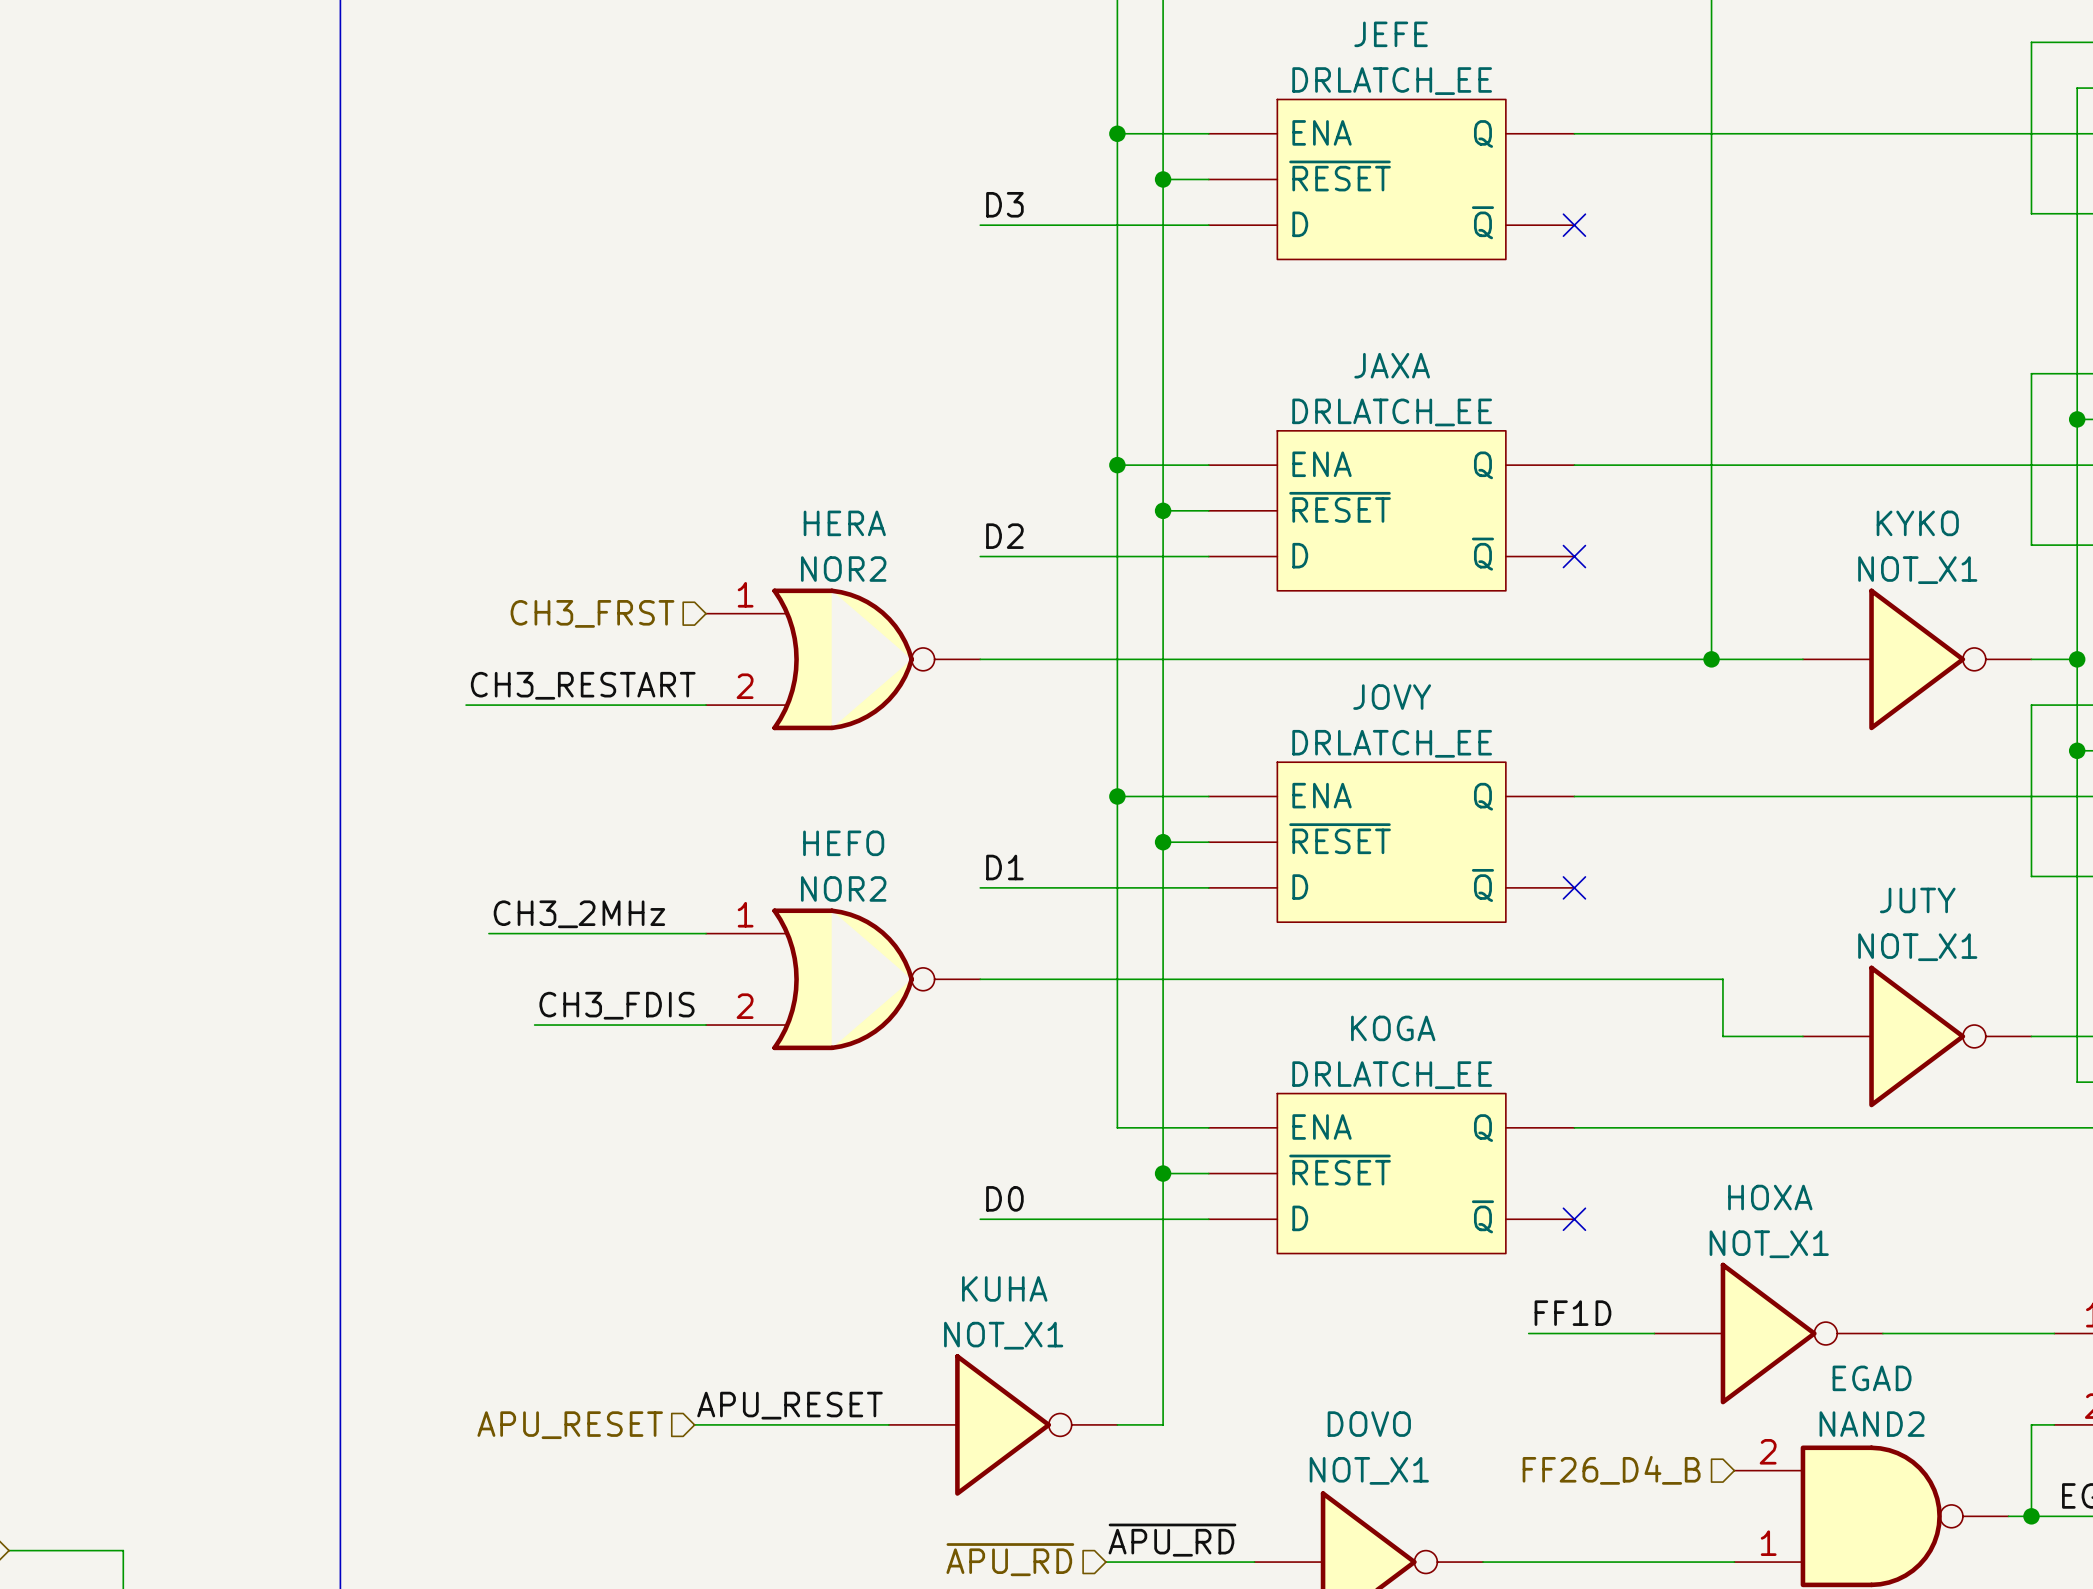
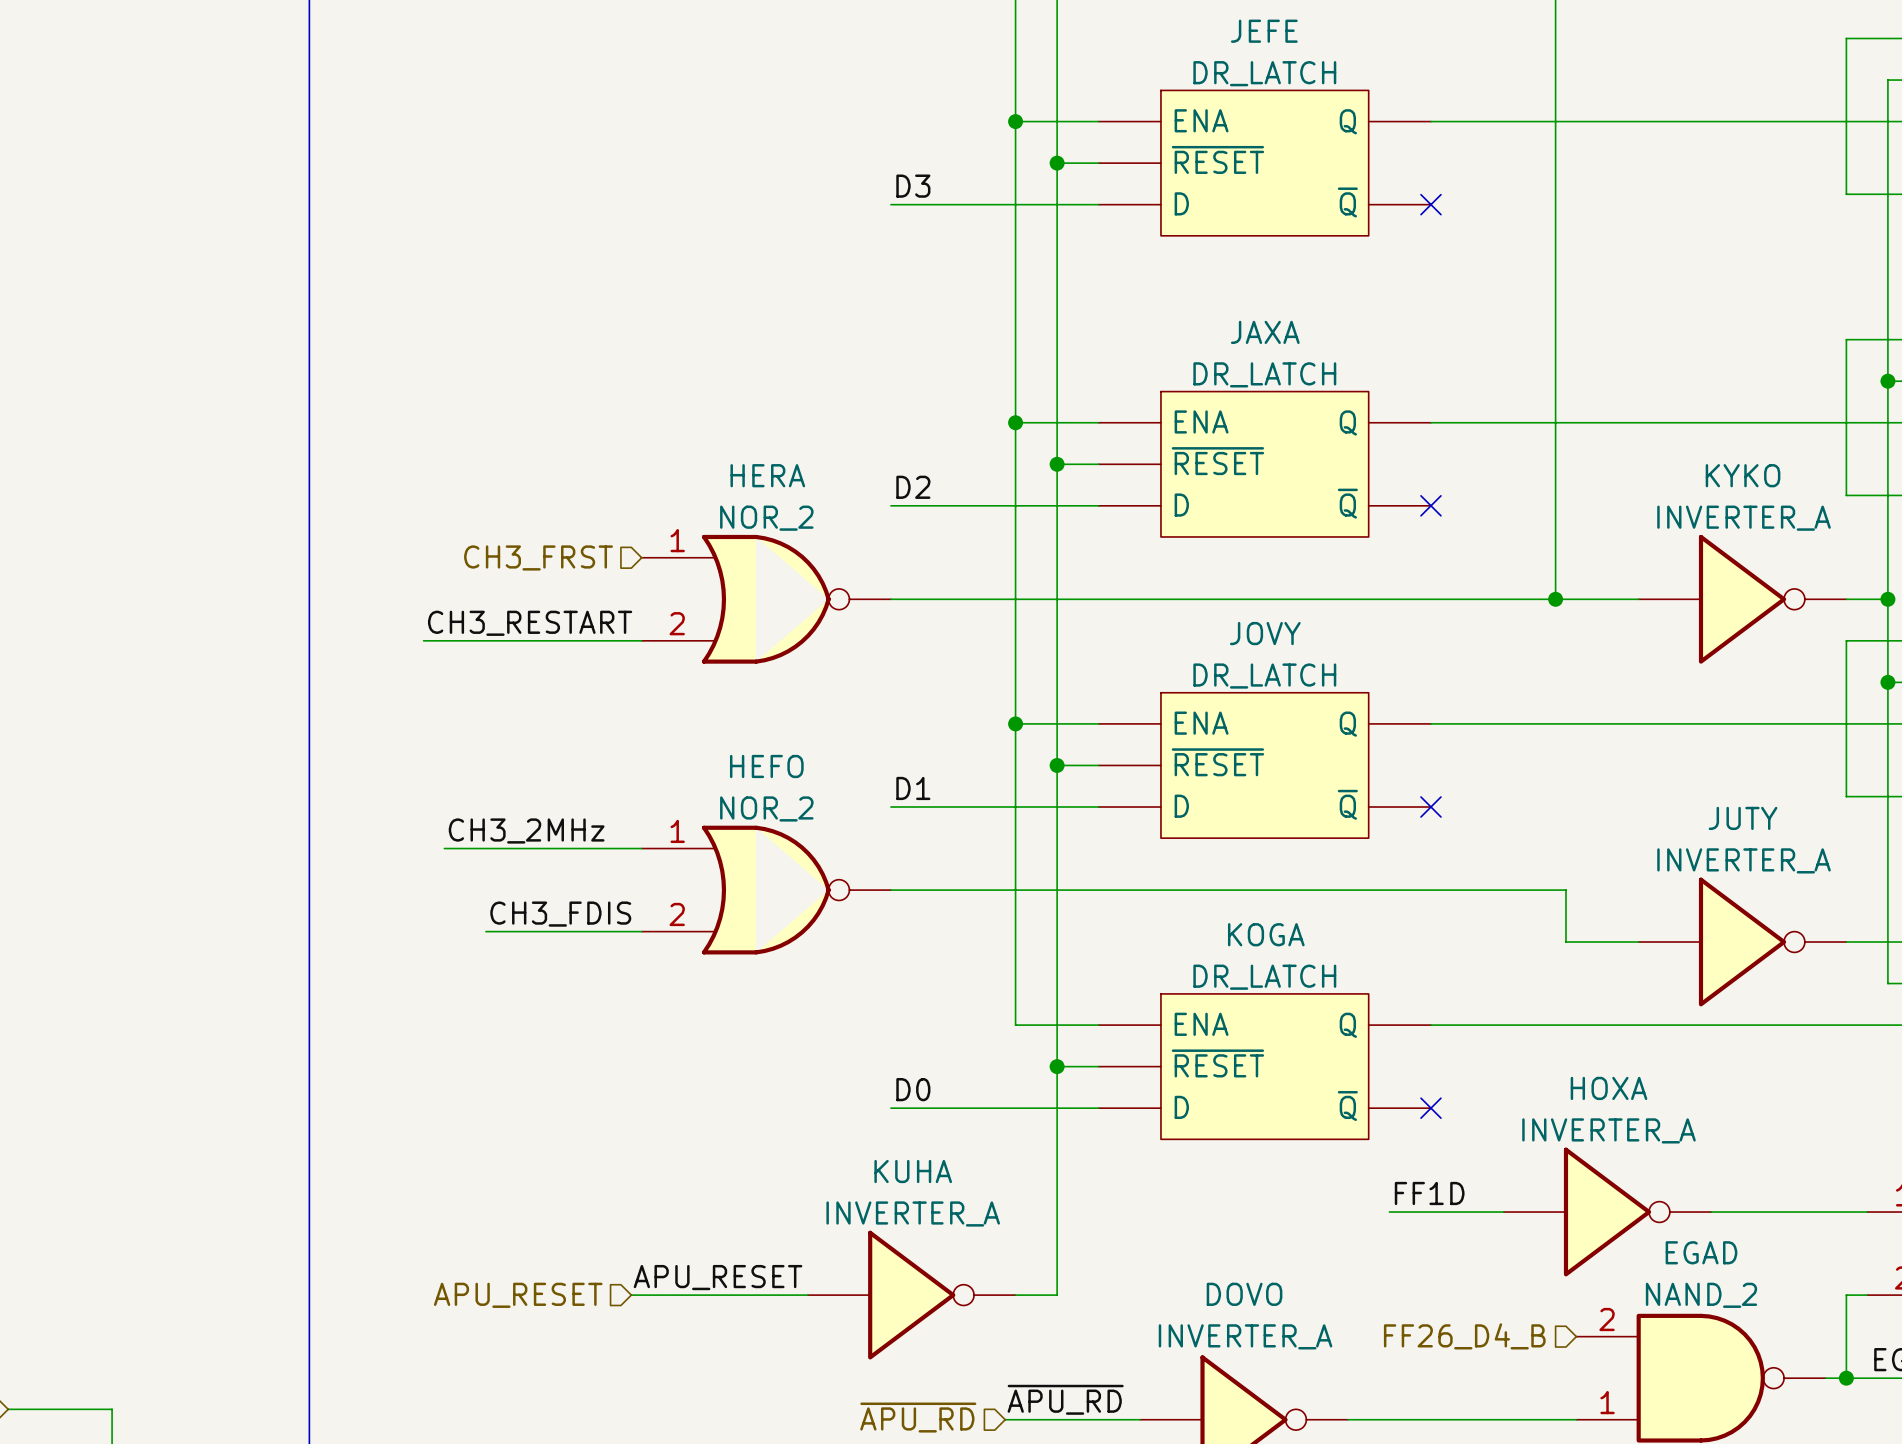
JEFE value: DRLATCH_EE (1392, 81) -> DR_LATCH (1264, 73)
JAXA value: DRLATCH_EE (1392, 412) -> DR_LATCH (1264, 374)
HERA value: NOR2 (843, 569) -> NOR_2 (766, 518)
KYKO value: NOT_X1 (1917, 570) -> INVERTER_A (1744, 518)
JOVY value: DRLATCH_EE (1392, 743) -> DR_LATCH (1264, 676)
HEFO value: NOR2 (843, 888) -> NOR_2 (766, 808)
JUTY value: NOT_X1 (1917, 947) -> INVERTER_A (1744, 860)
KOGA value: DRLATCH_EE (1392, 1075) -> DR_LATCH (1264, 977)
HOXA value: NOT_X1 (1769, 1244) -> INVERTER_A (1609, 1130)
KUHA value: NOT_X1 (1003, 1335) -> INVERTER_A (913, 1213)
EGAD value: NAND2 (1872, 1424) -> NAND_2 (1701, 1295)
DOVO value: NOT_X1 (1369, 1470) -> INVERTER_A (1245, 1336)

